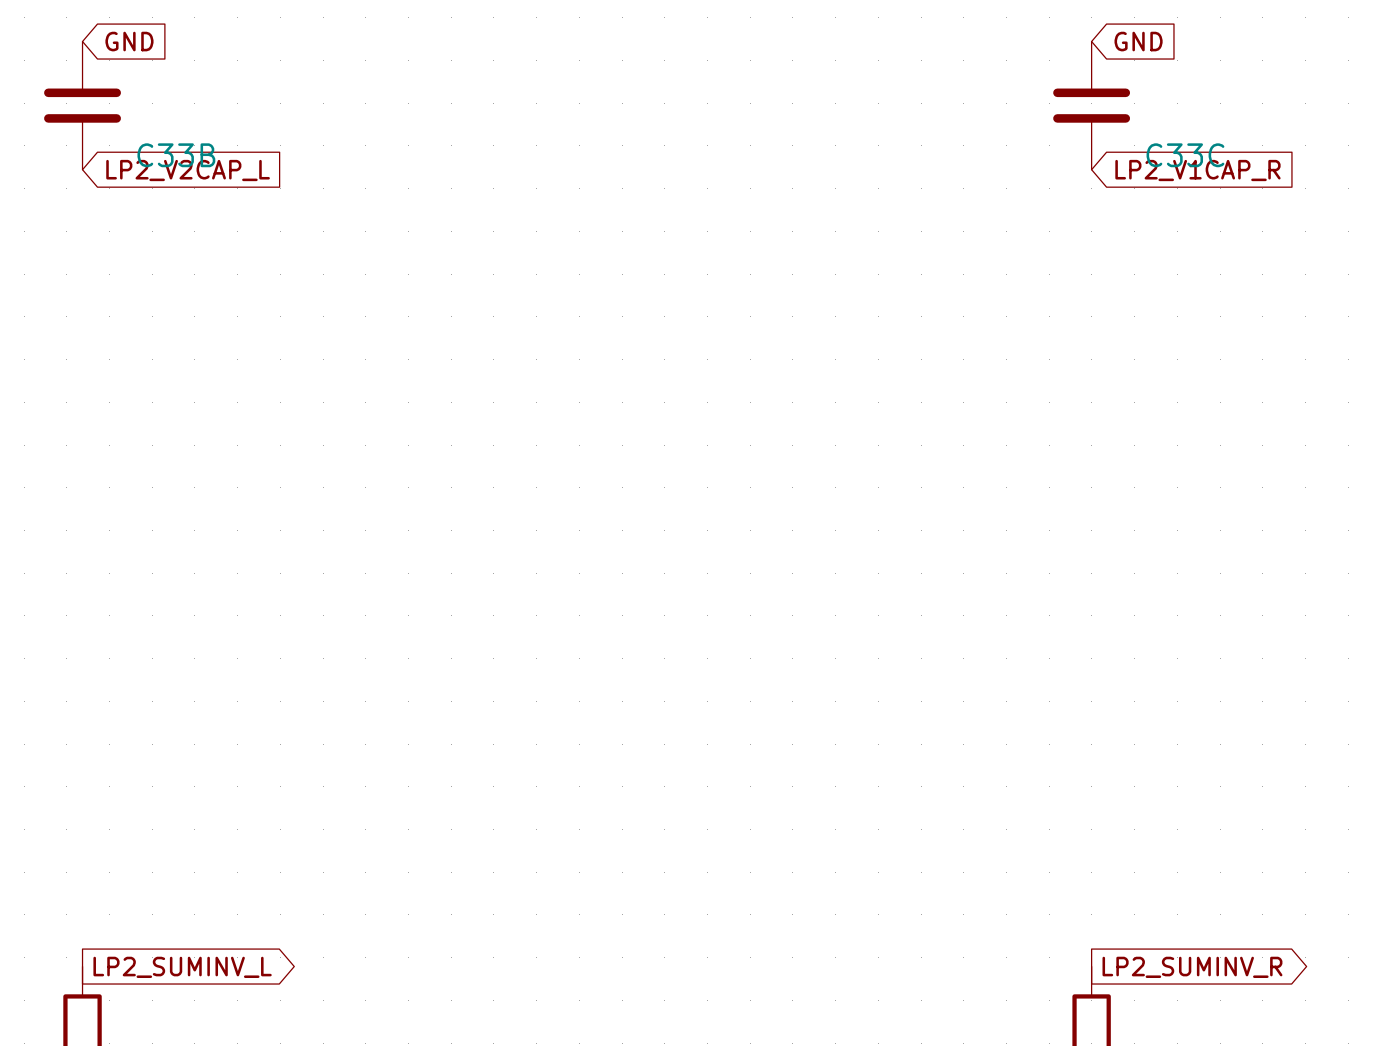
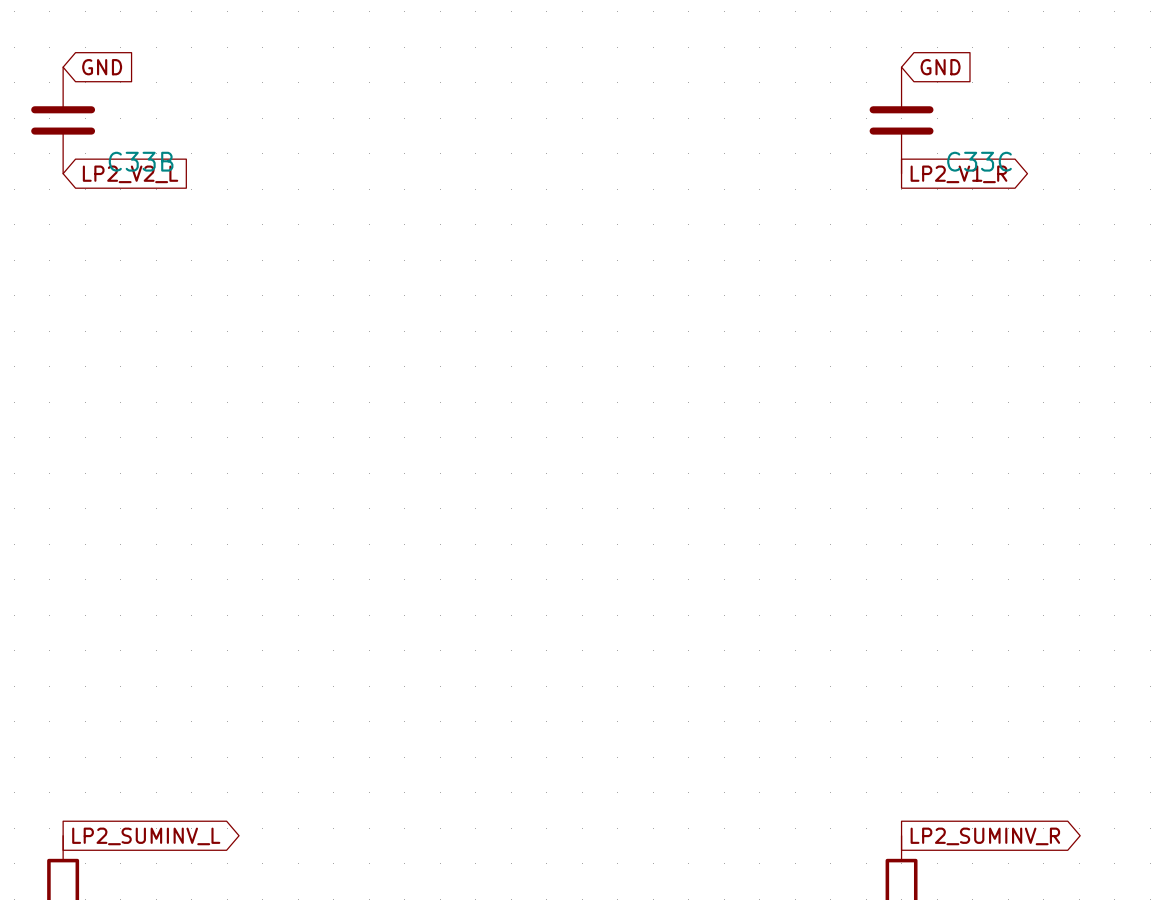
global label: LP2_V2CAP_L (188, 170) -> LP2_V2_L (130, 174)
global label shape: input (1197, 170) -> output (958, 174)
global label: LP2_V1CAP_R (1197, 170) -> LP2_V1_R (958, 174)

